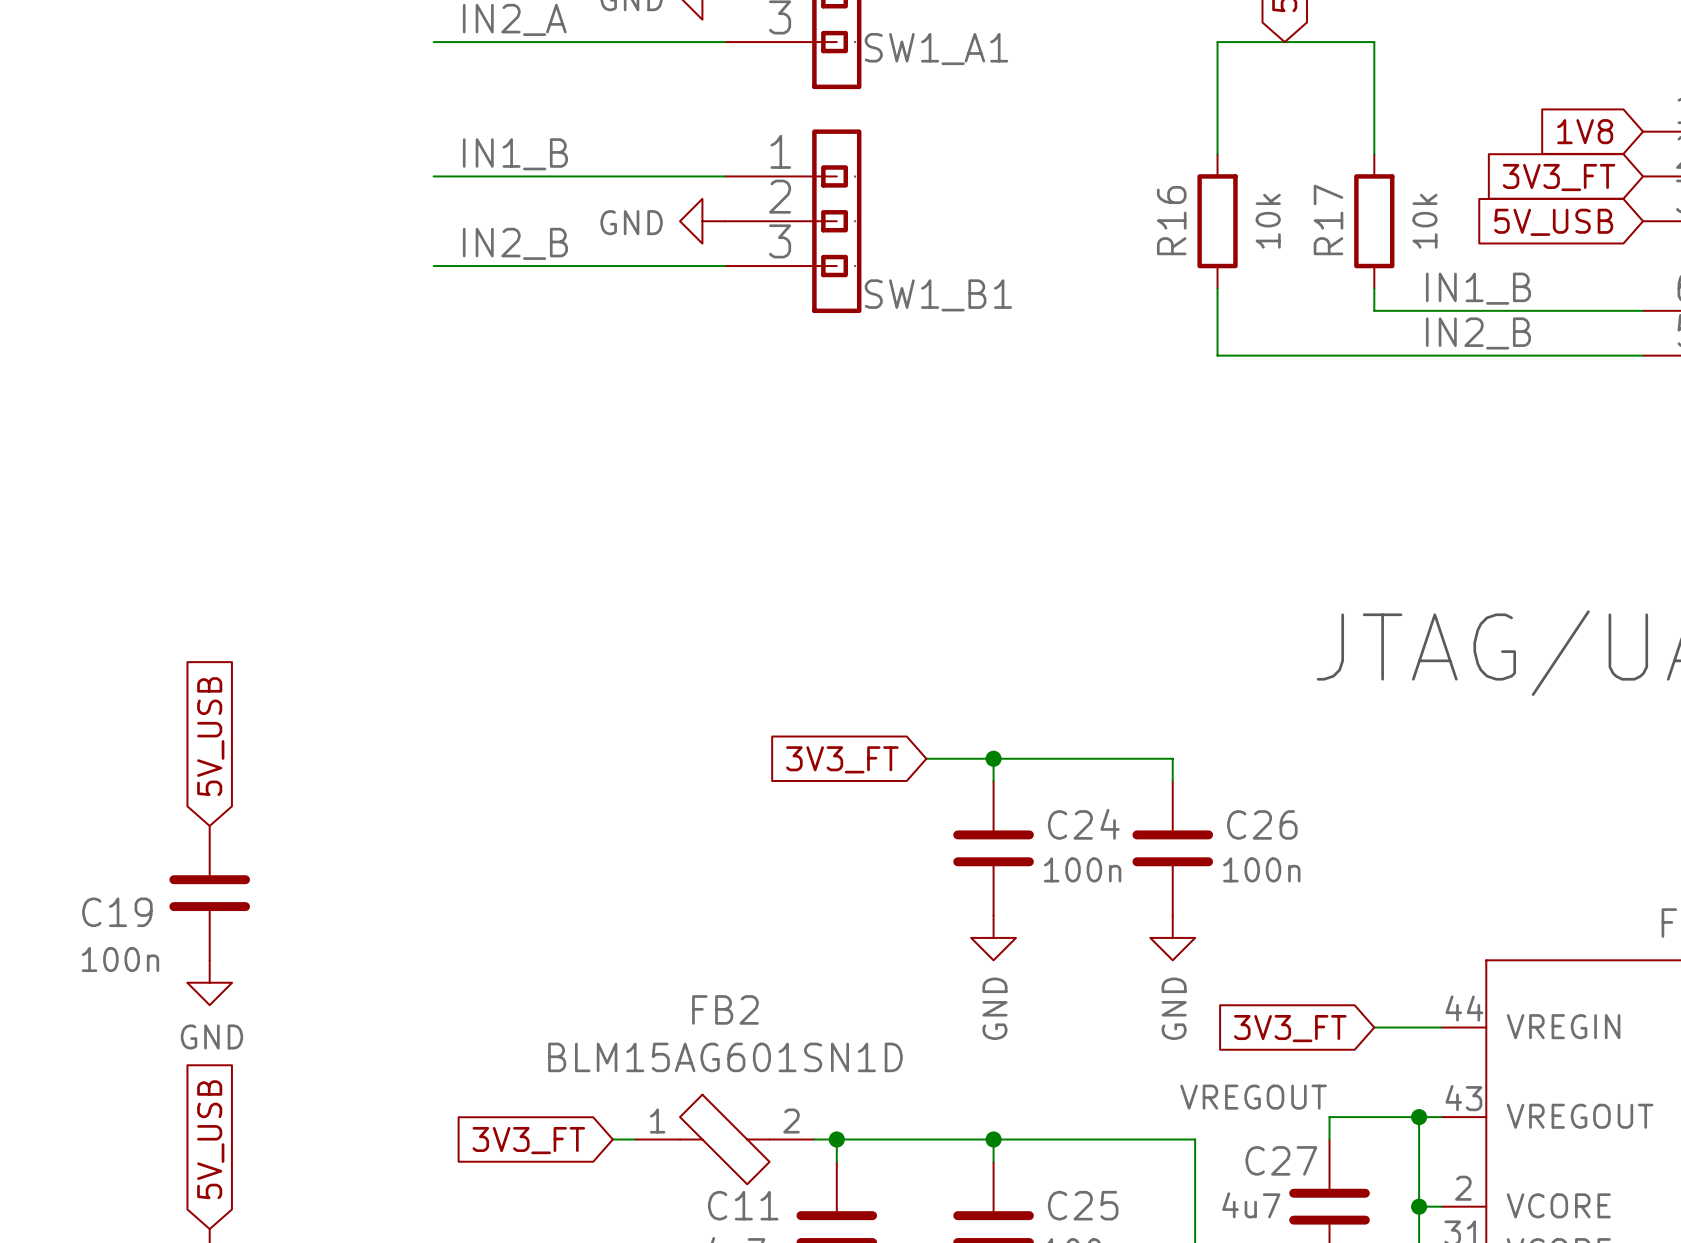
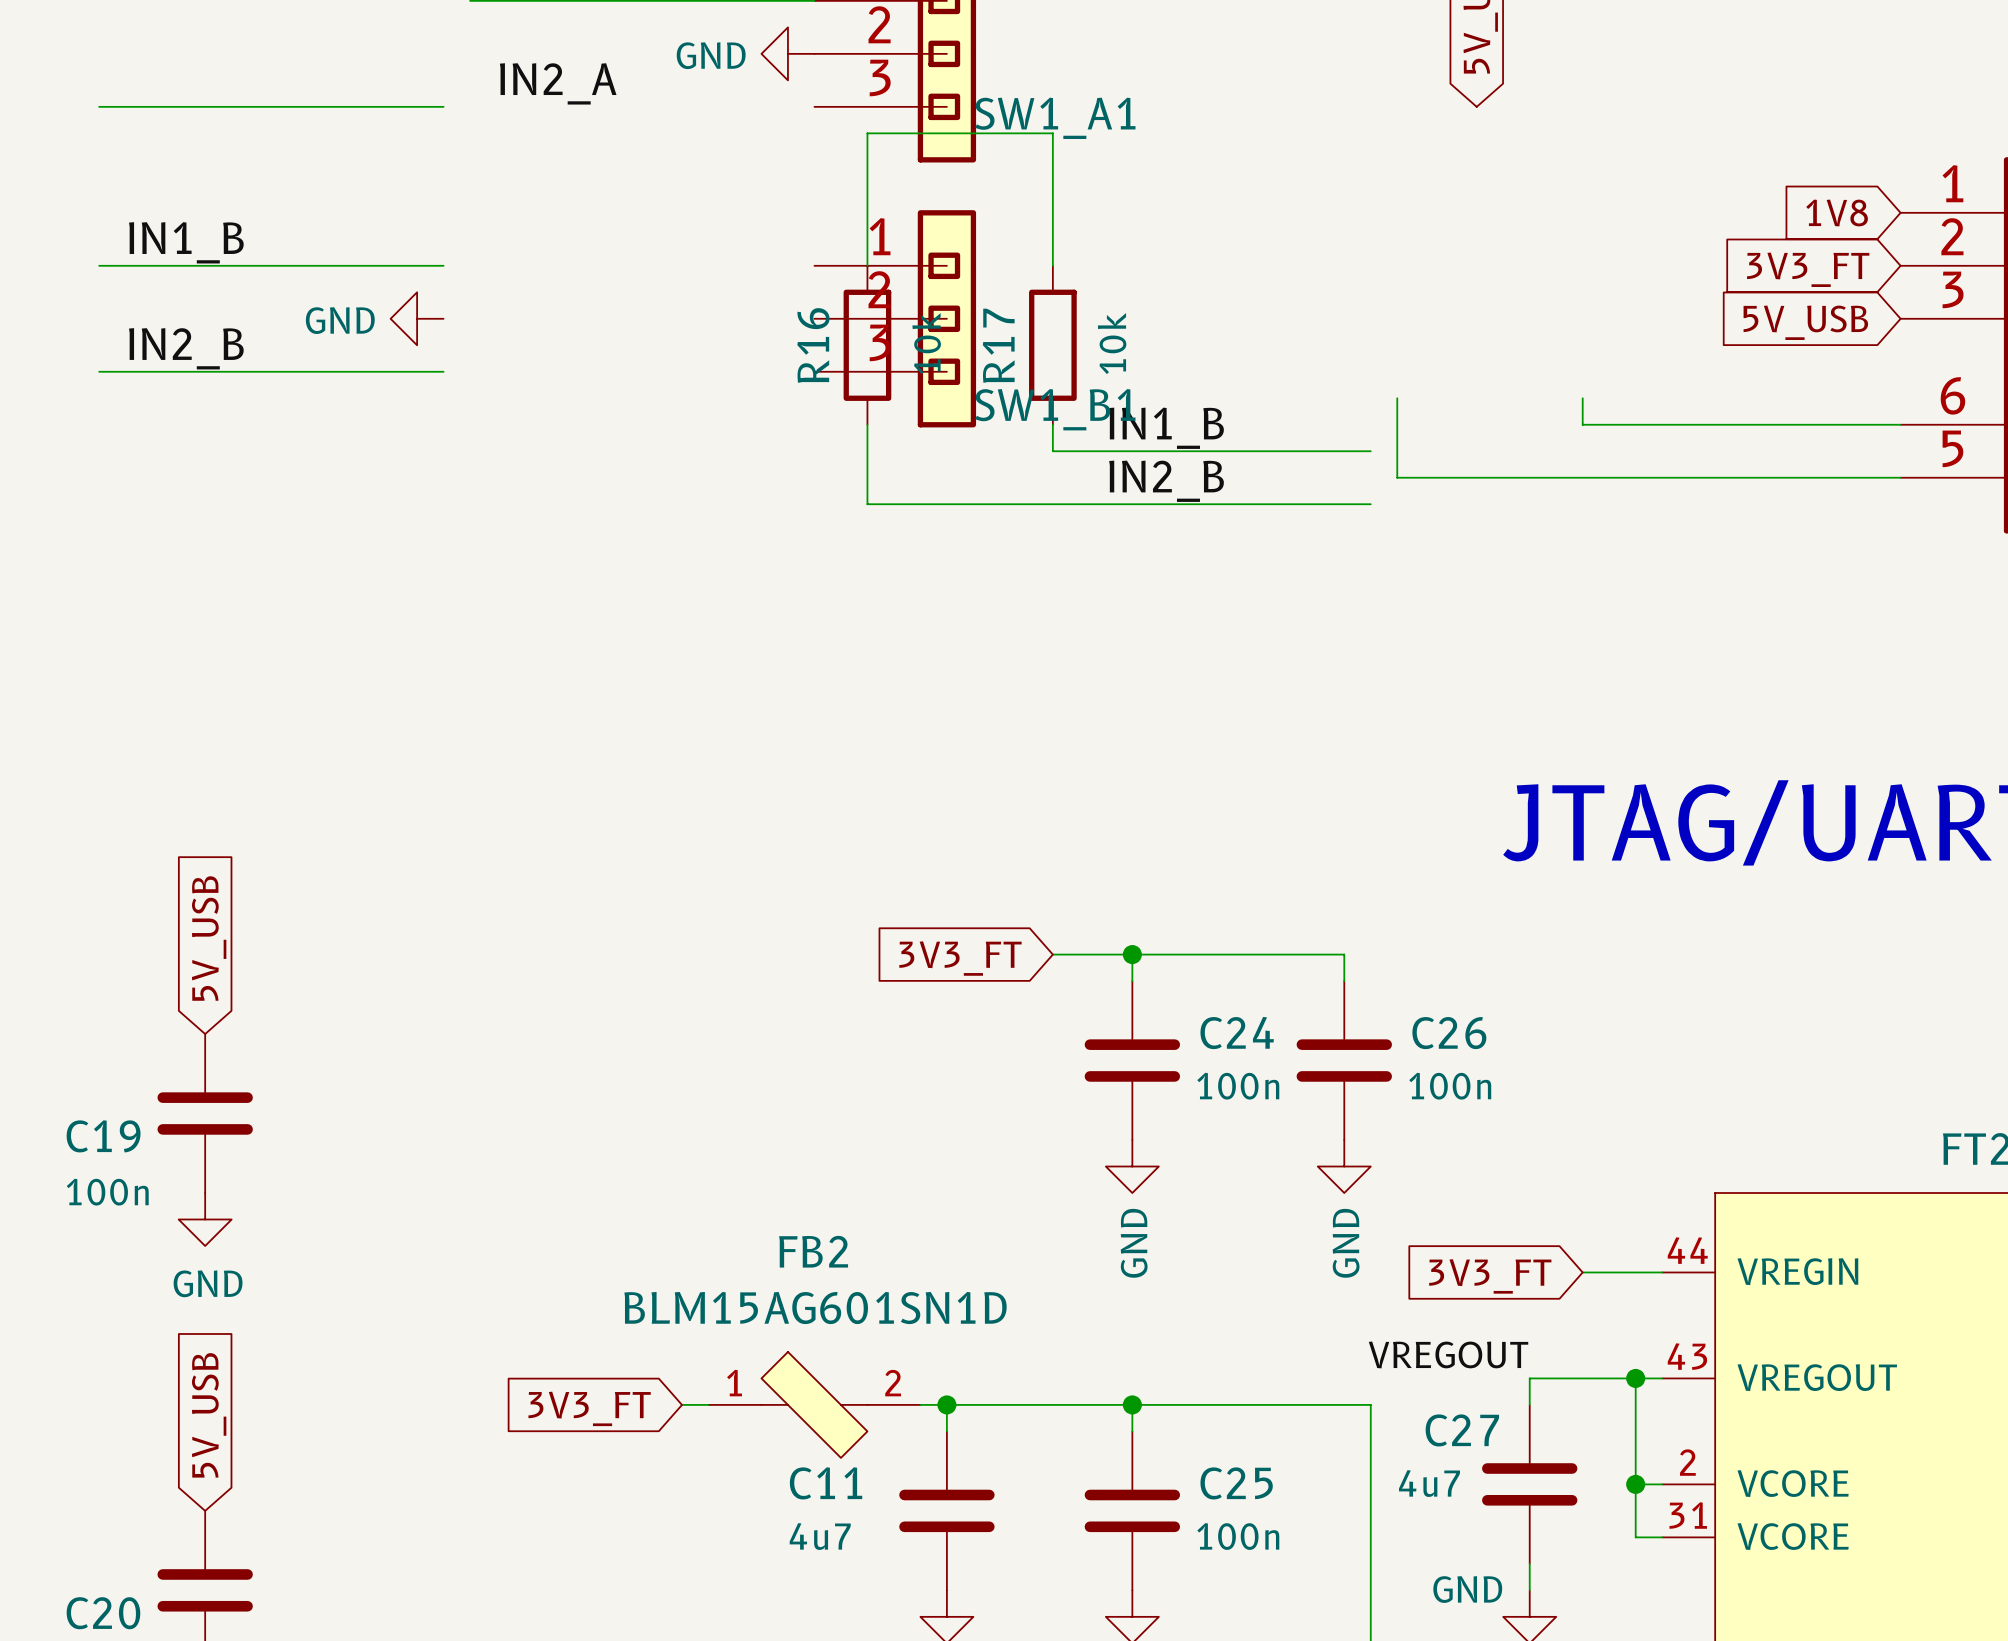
wire: (433, 42) (724, 42) -> (99, 106) (443, 106)
label: none -> IN1_B (186, 242)
label: IN1_B (515, 154) -> none
wire: (1217, 154) (1217, 42) (1374, 42) (1374, 154) -> none
wire: (433, 176) (724, 176) -> (99, 265) (443, 265)
wire: none -> (867, 265) (867, 133) (1052, 133) (1052, 265)
power symbol position: GND (702, 221) -> GND (417, 318)
R16 position: (1217, 221) -> (867, 345)
R17 position: (1374, 221) -> (1052, 345)
label: none -> IN2_B (186, 348)
label: IN2_B (515, 243) -> none
wire: (433, 266) (724, 266) -> (99, 371) (443, 371)
label: IN1_B (1478, 288) -> none
wire: none -> (867, 424) (867, 504) (1370, 504)
wire: none -> (1052, 424) (1052, 451) (1370, 451)
label: none -> IN1_B (1166, 428)
label: IN2_B (1478, 333) -> none
label: none -> IN2_B (1166, 481)

